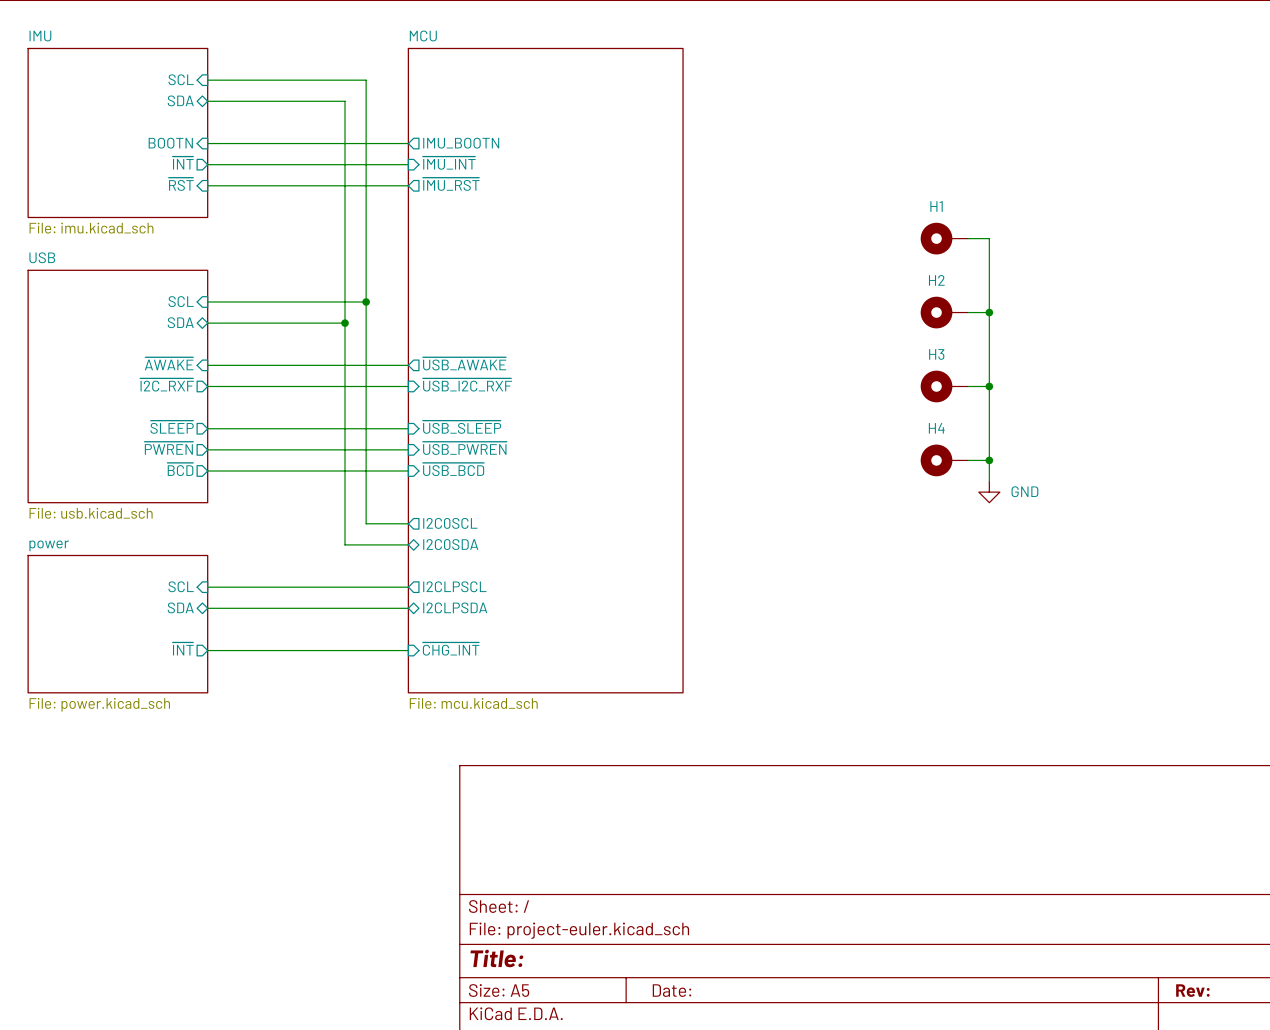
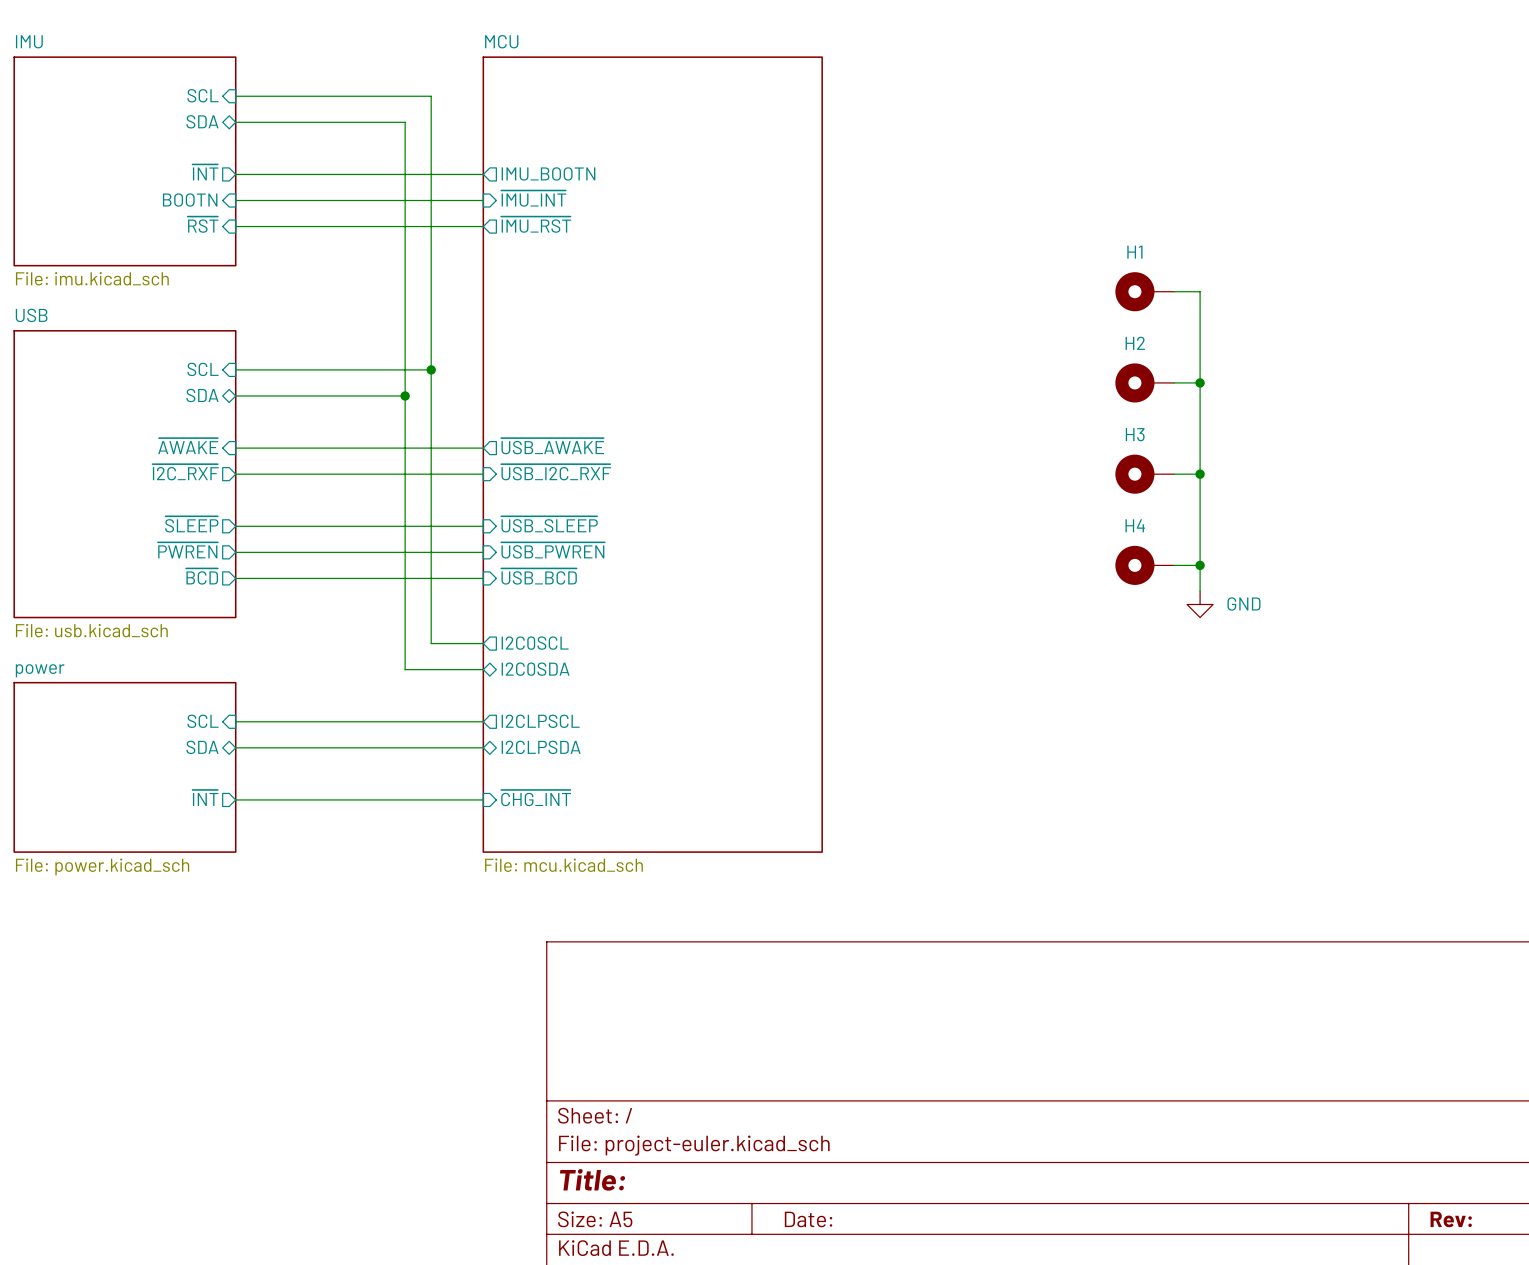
sheet pin shape: input (170, 143) -> output (205, 172)
sheet pin: BOOTN (170, 143) -> ~{INT} (205, 172)
sheet pin shape: output (183, 163) -> input (190, 200)
sheet pin: ~{INT} (183, 163) -> BOOTN (190, 200)

